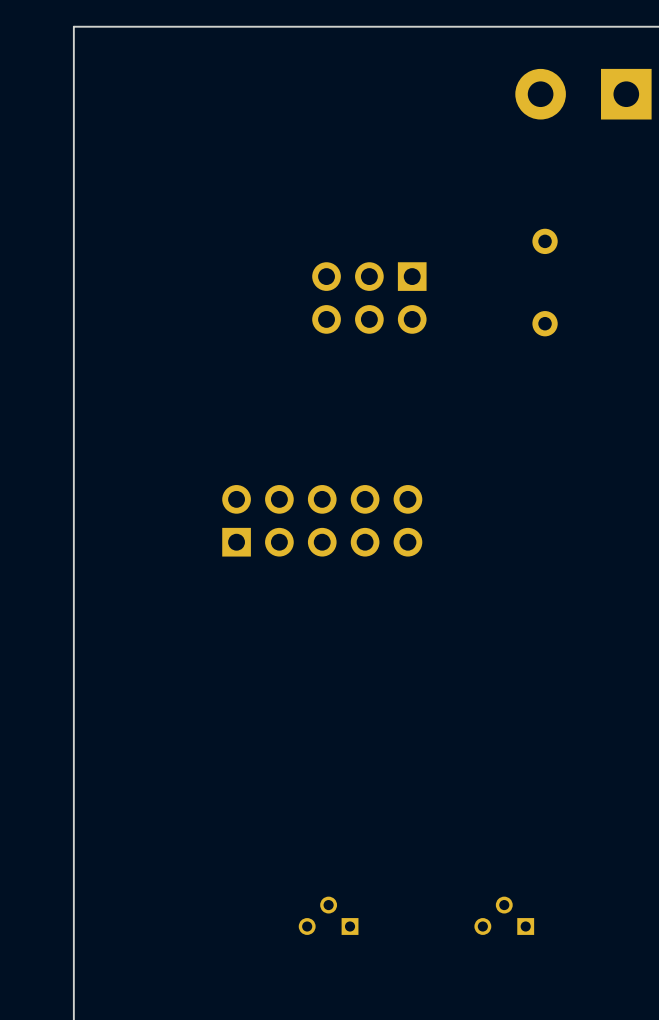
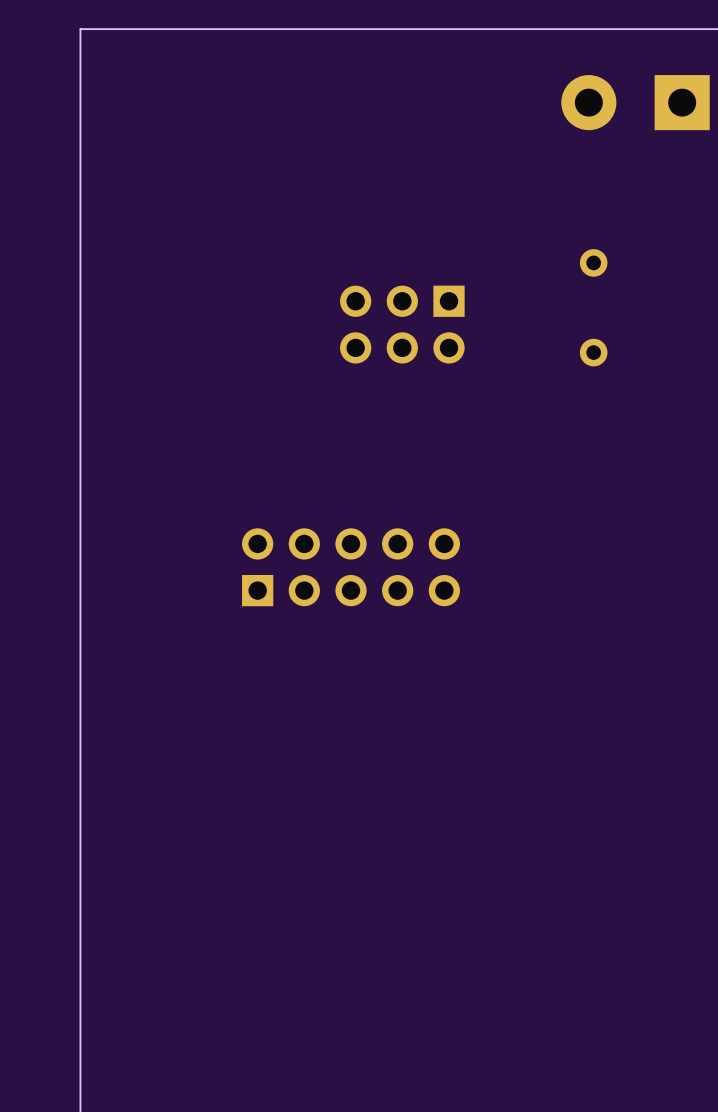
part: (328, 915) -> none
part: (504, 915) -> none

